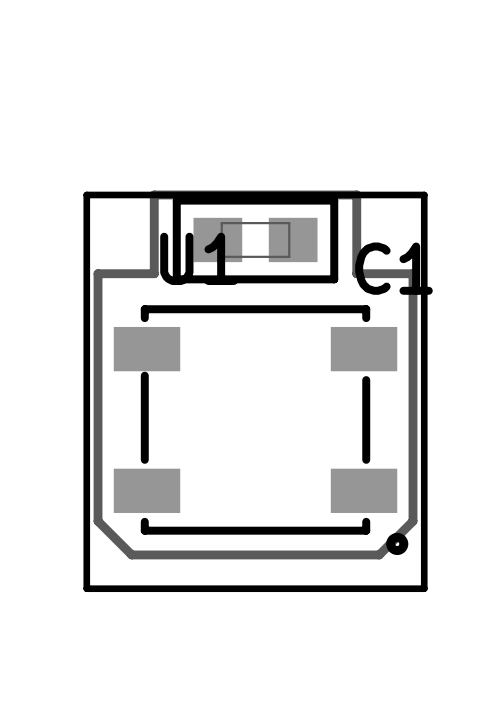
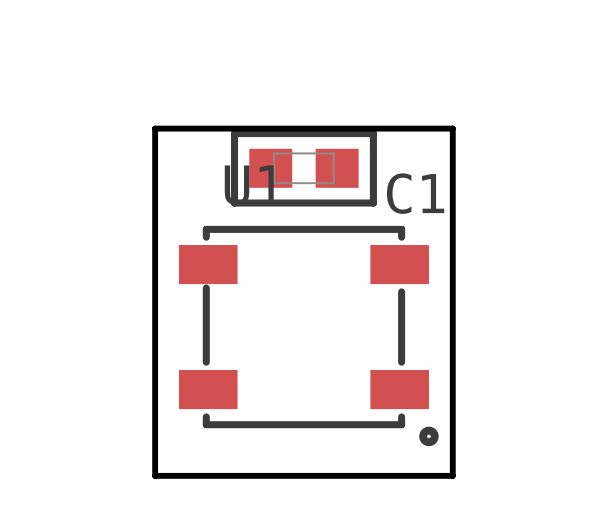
line: (154, 194) (356, 194) (356, 273) (413, 273) (413, 521) (379, 554) (131, 554) (98, 521) (98, 273) (154, 273) (154, 194) -> none

